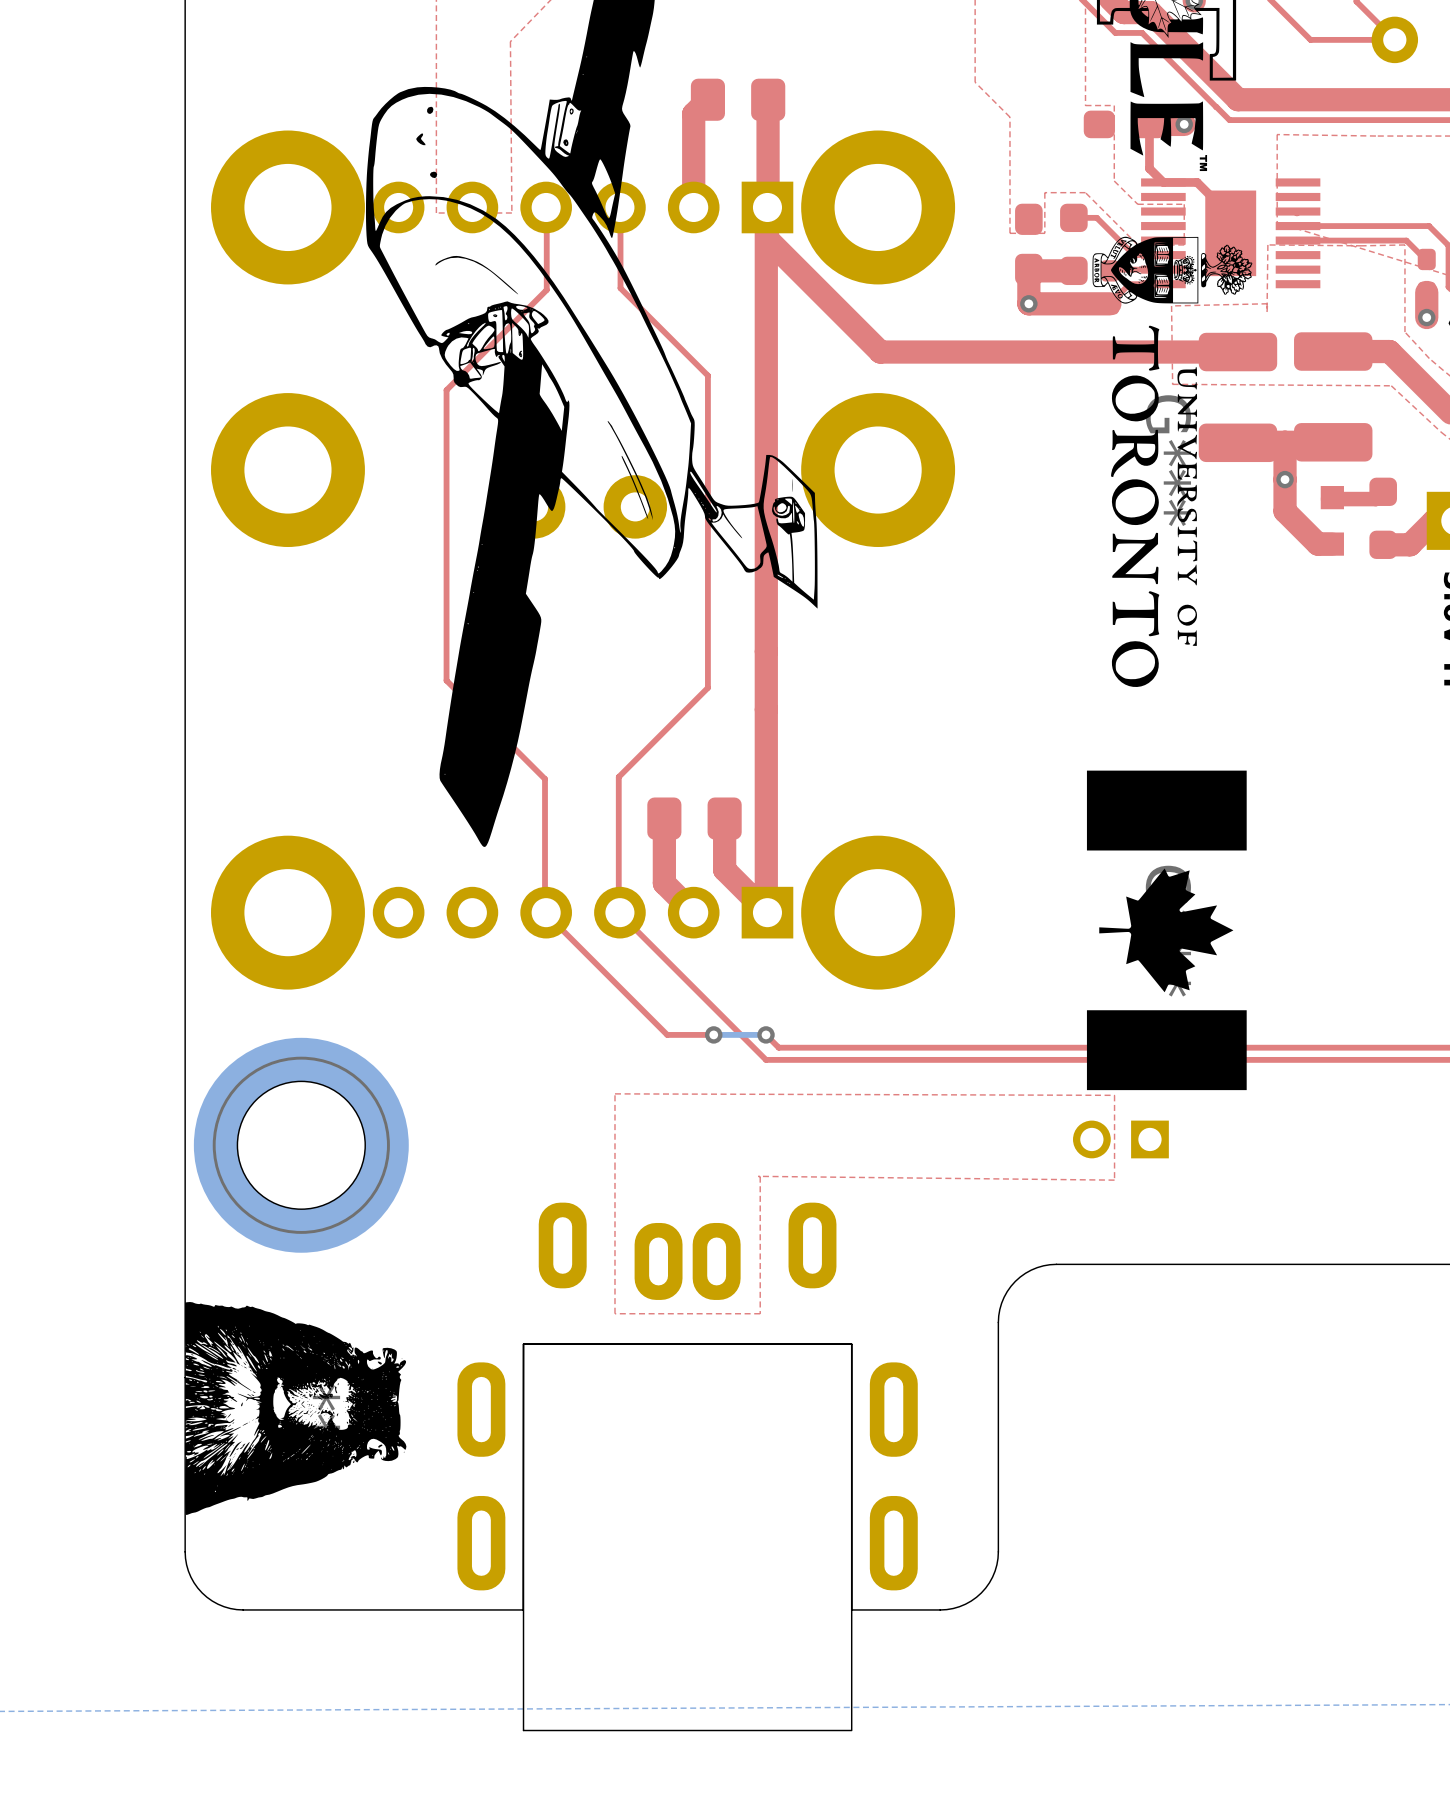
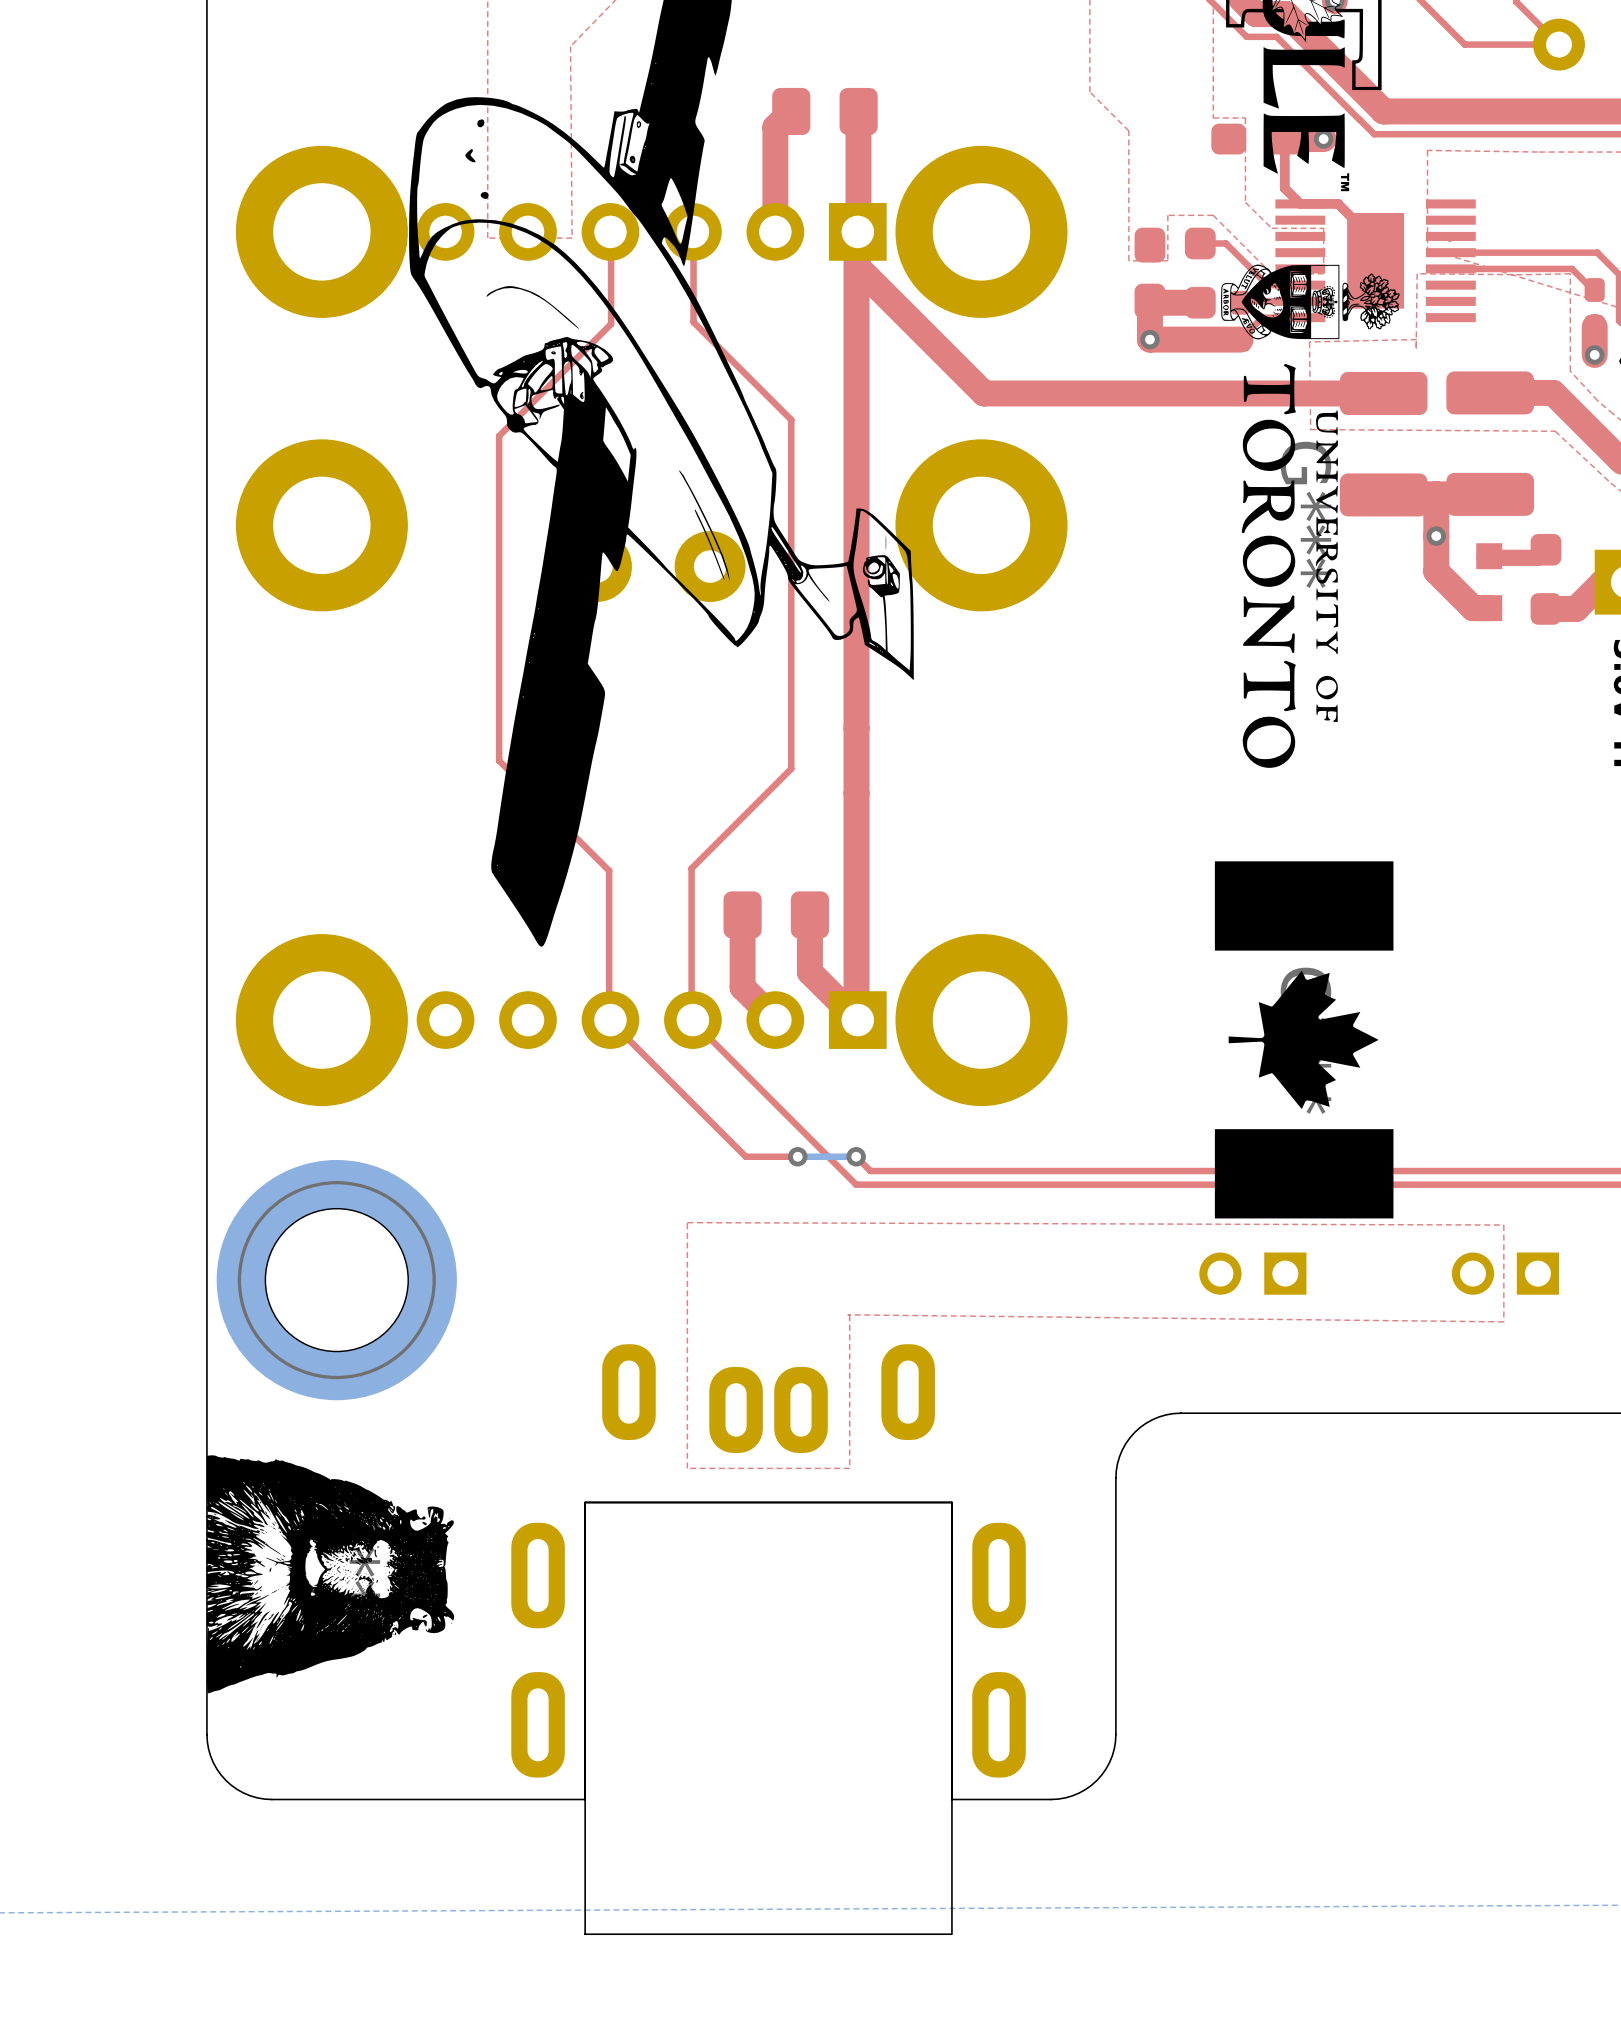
top zone outline: (1114, 1095) (1114, 1180) (758, 1176) -> (1245, 1224) (1503, 1225) (1503, 1321) (847, 1314)
part: none -> (1505, 1273)

